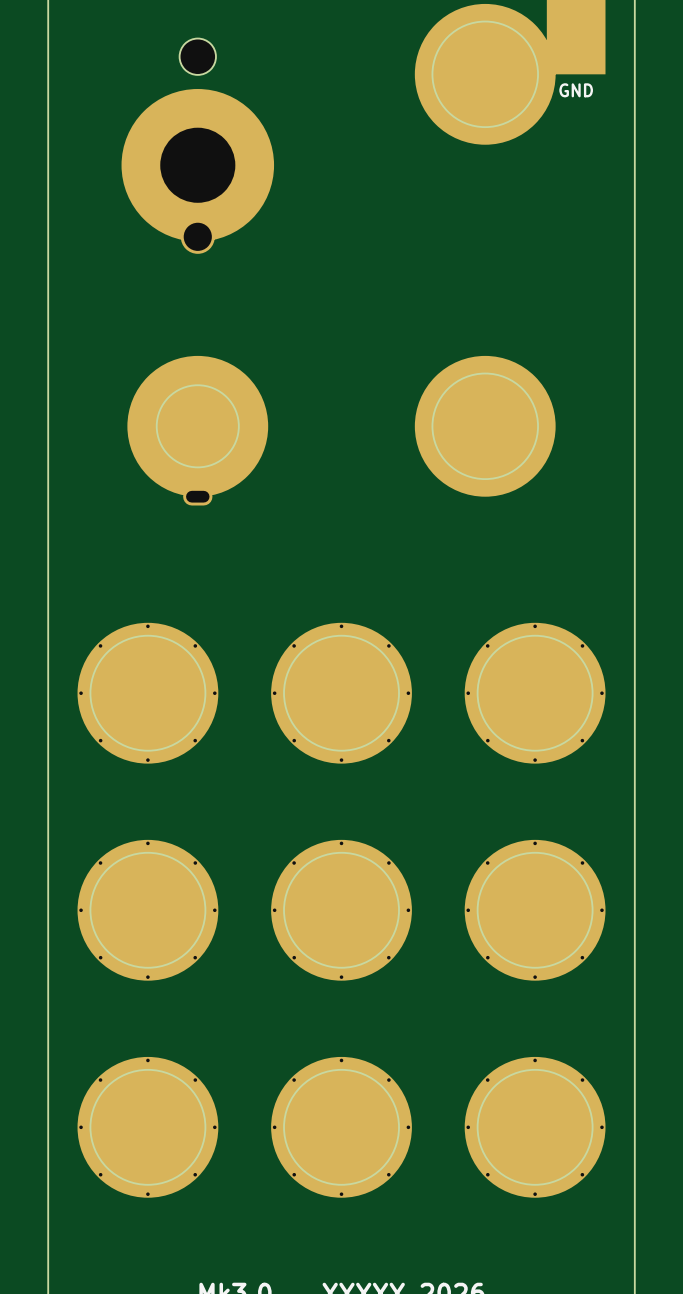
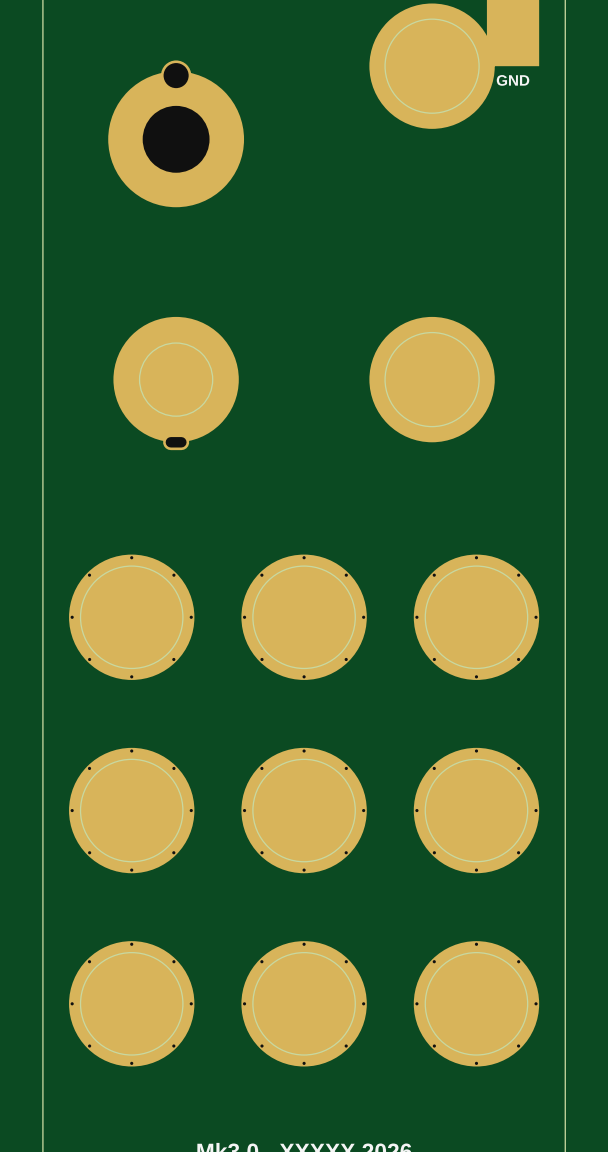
part: (197, 56) -> none
part rotation: 0° (197, 171) -> 180° (176, 133)

